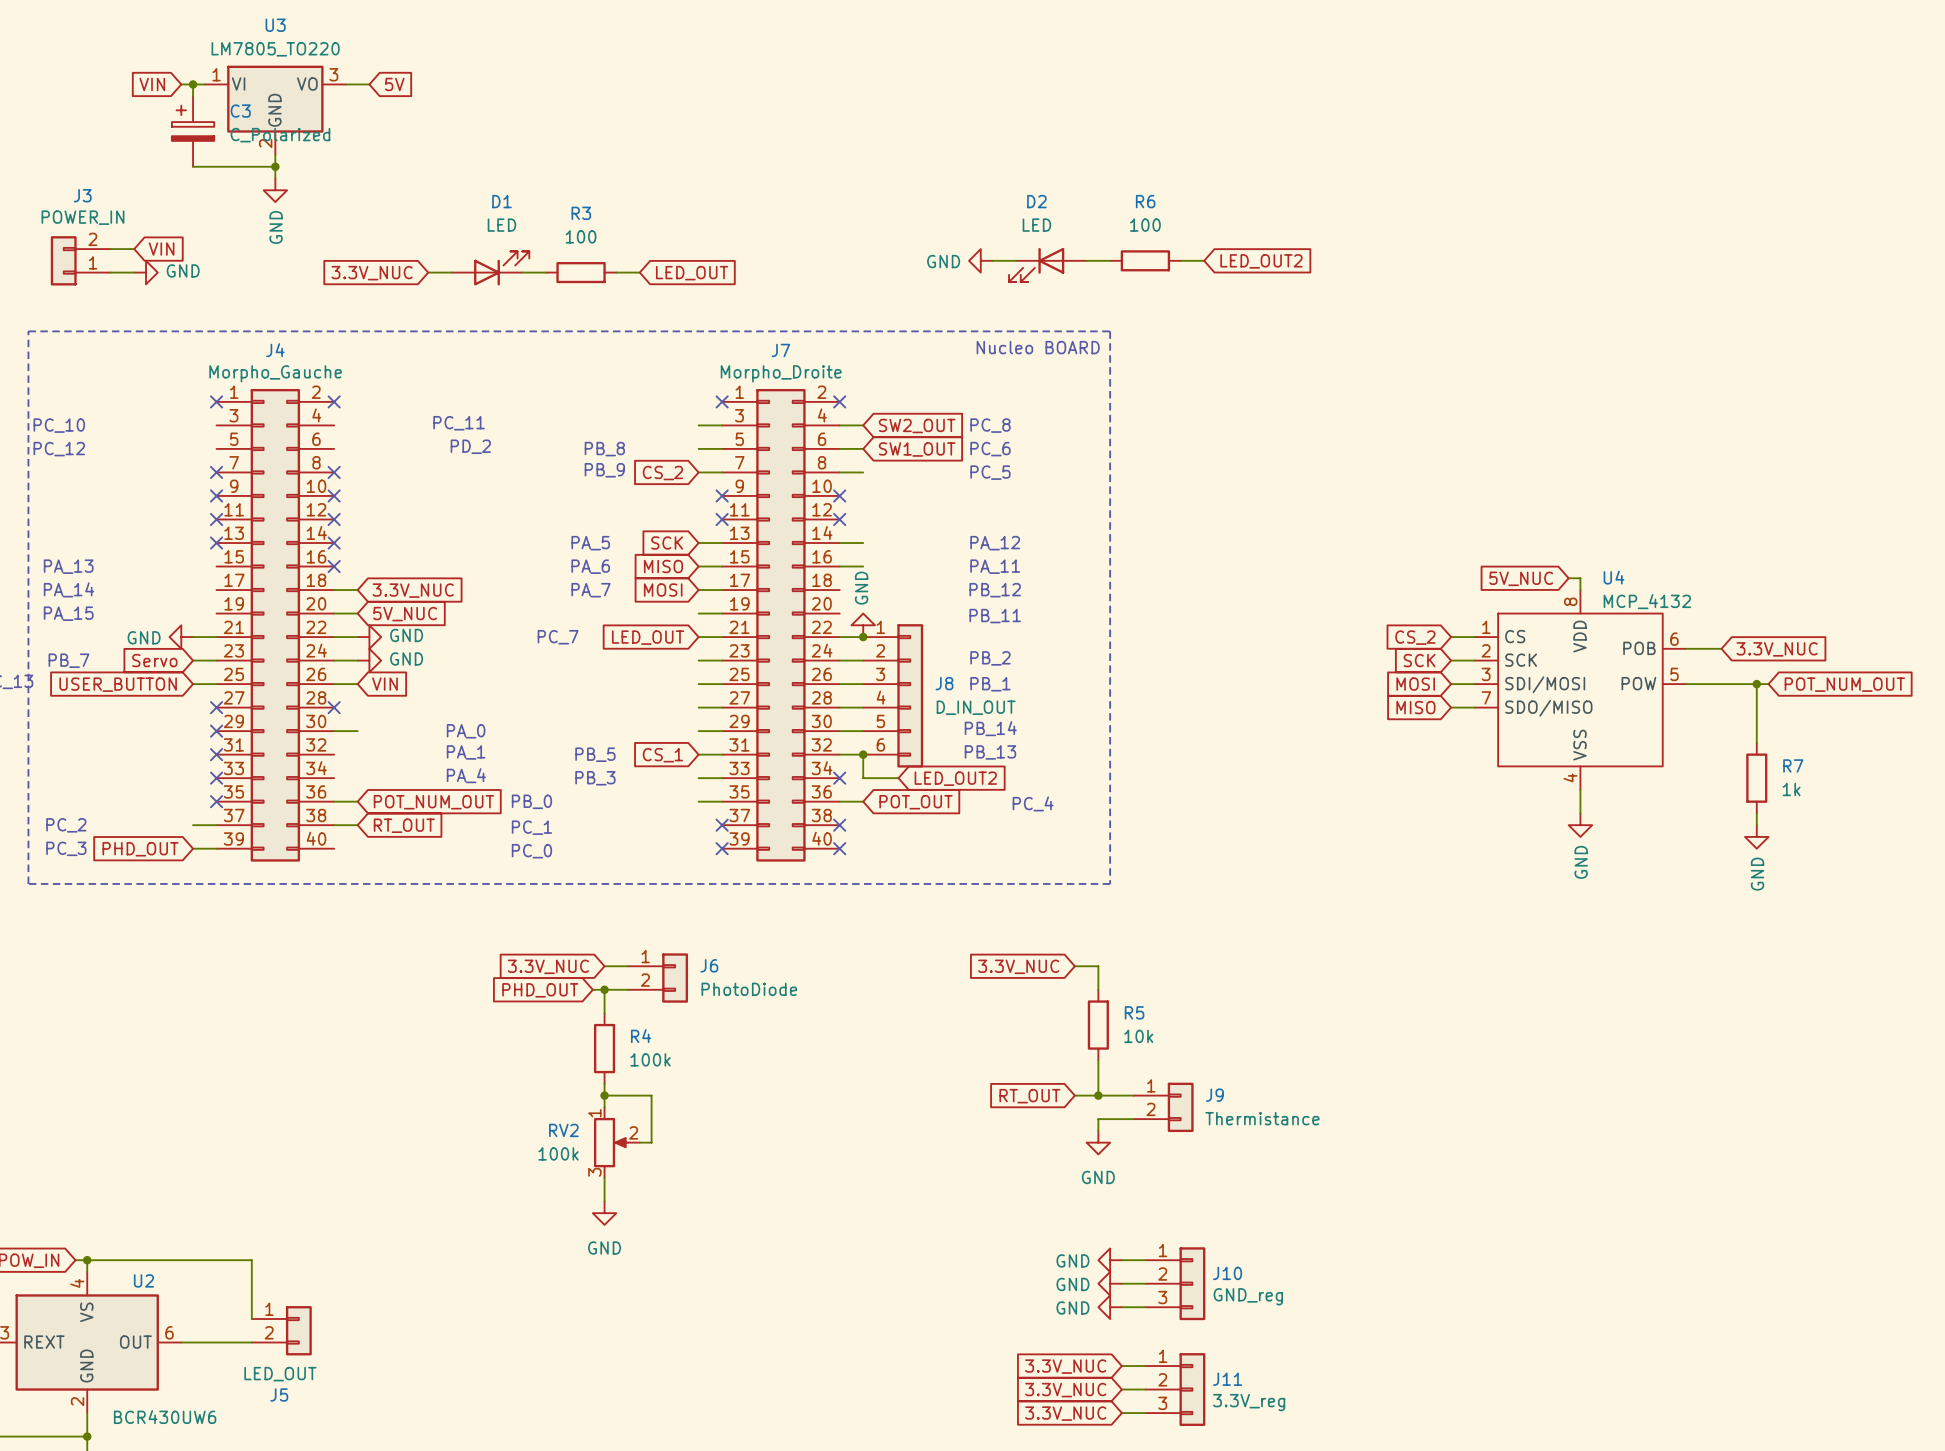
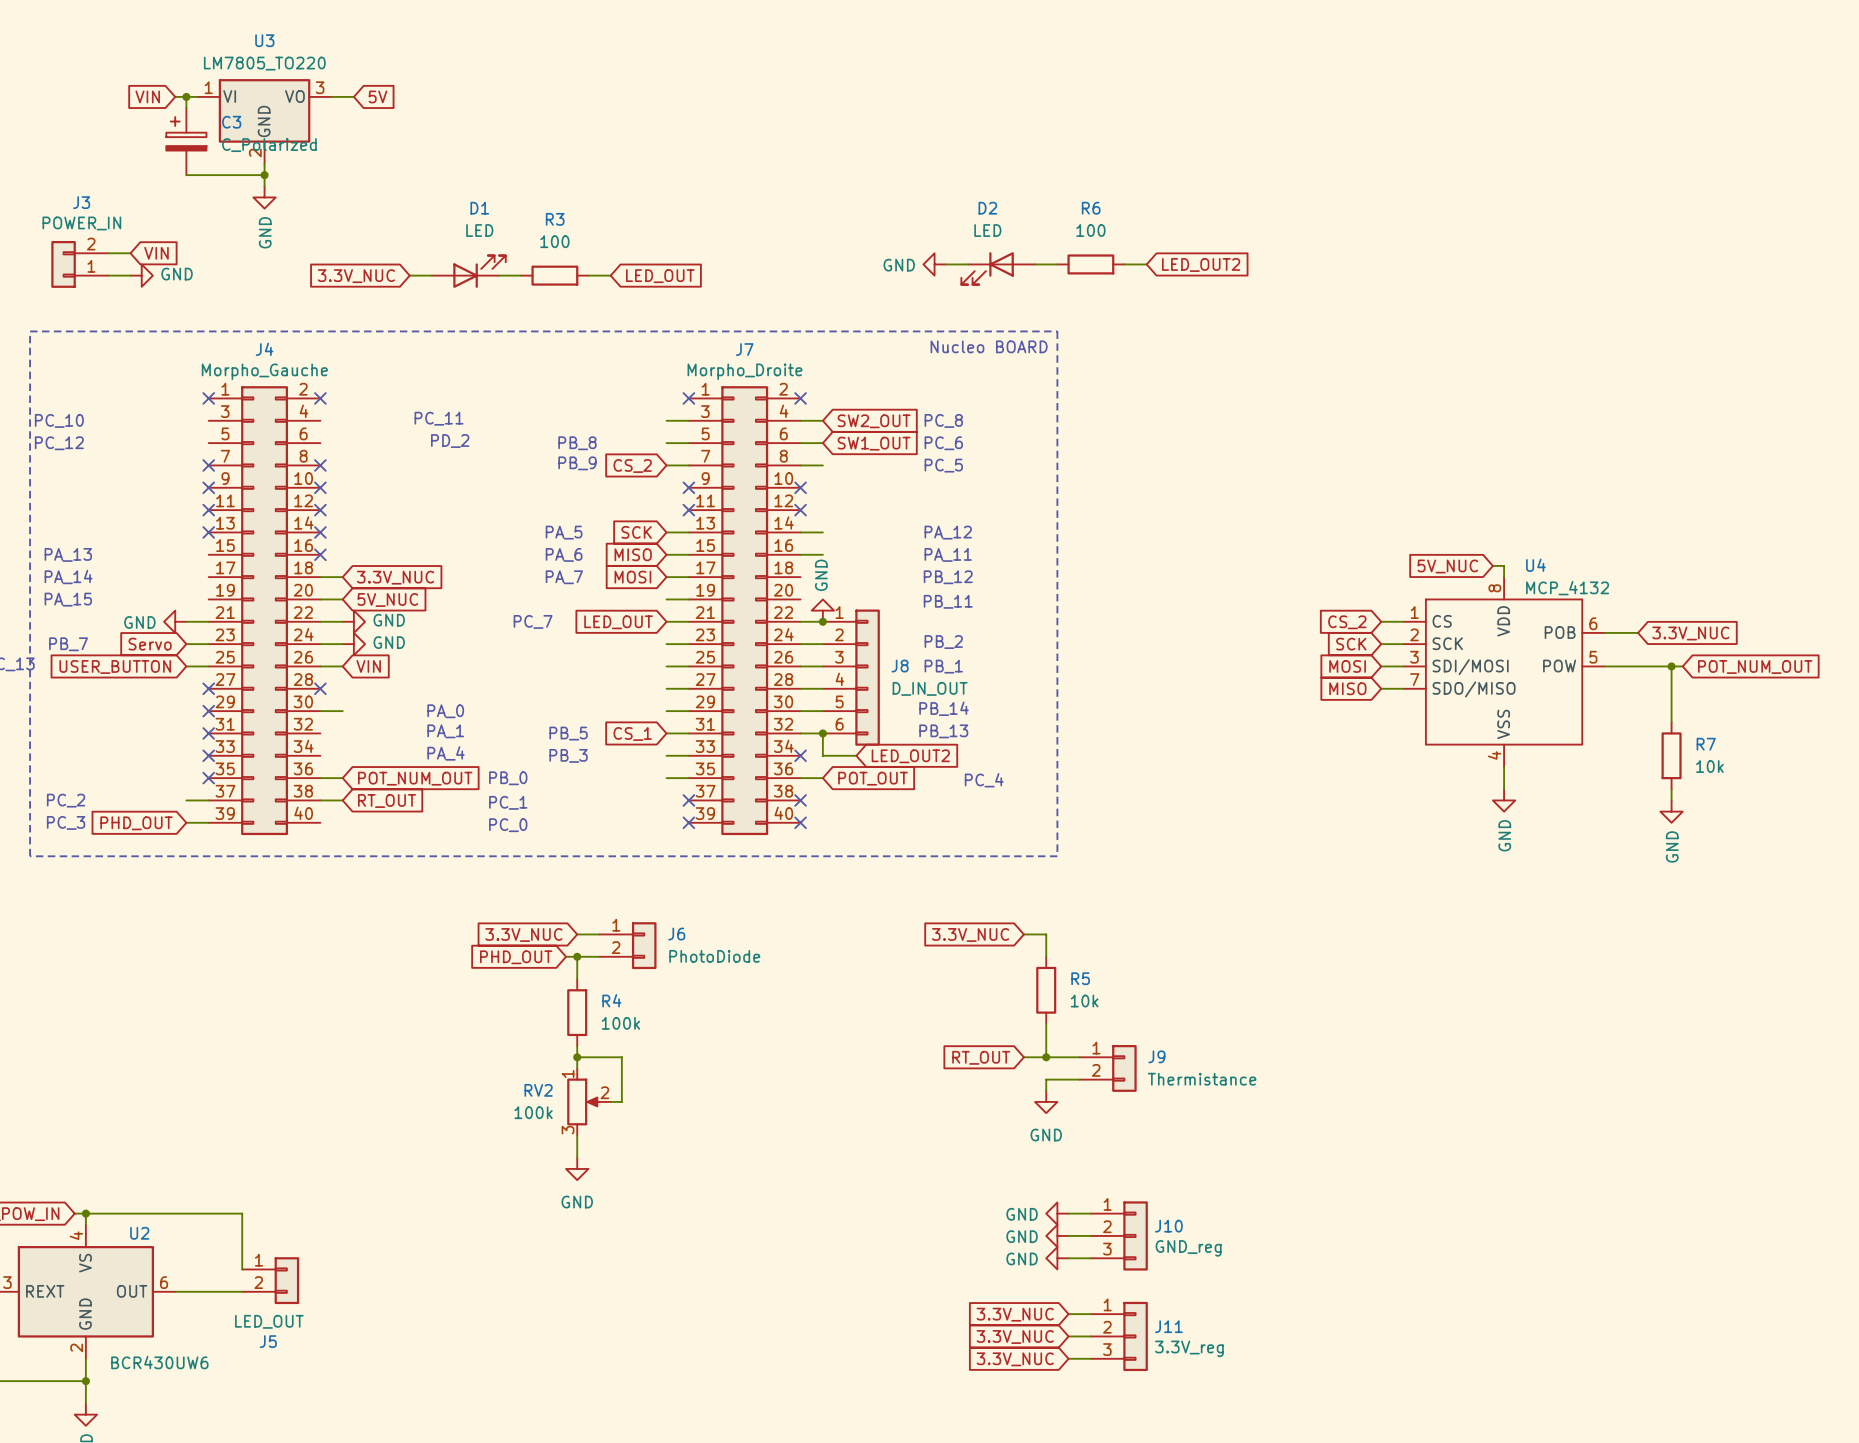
R7 value: 1k (1791, 789) -> 10k (1709, 766)

